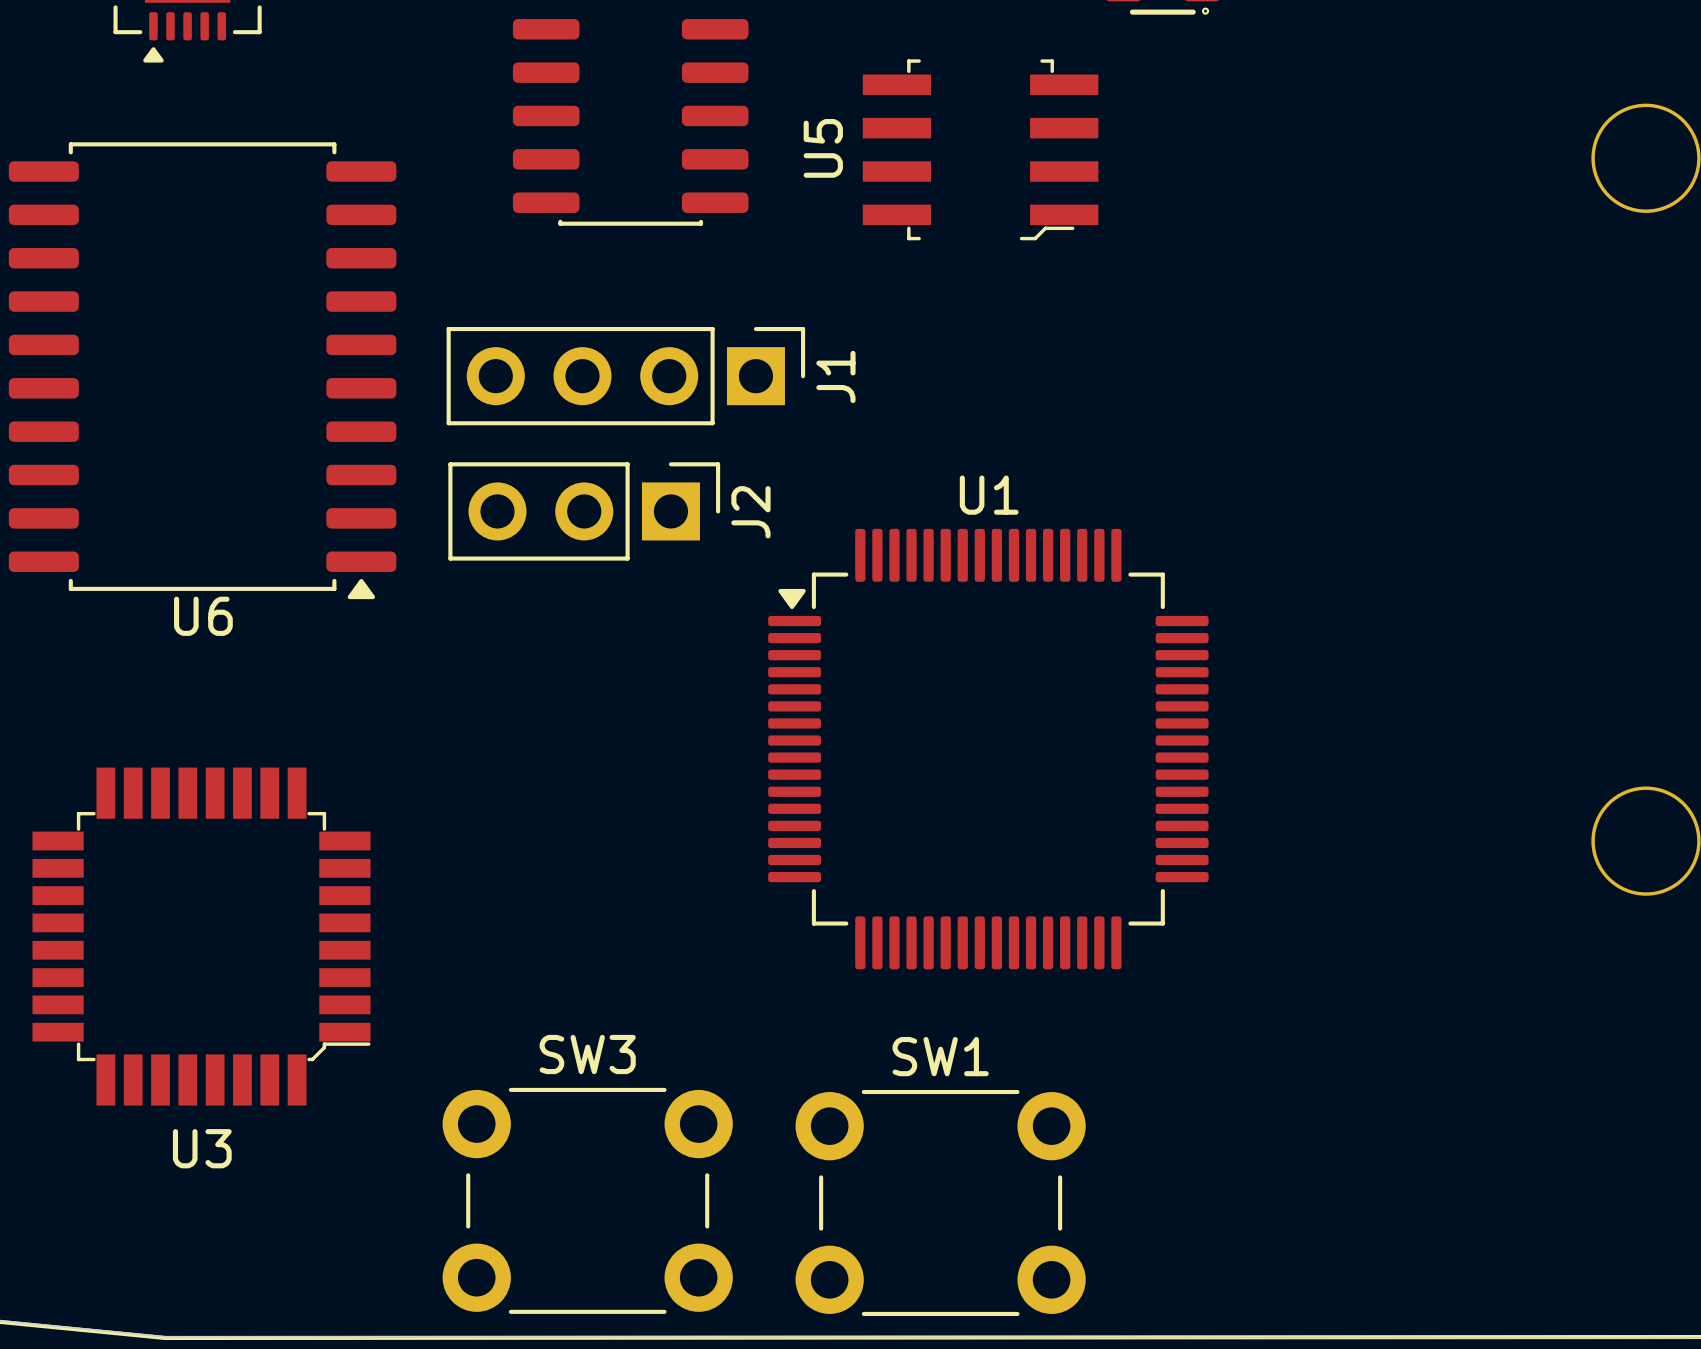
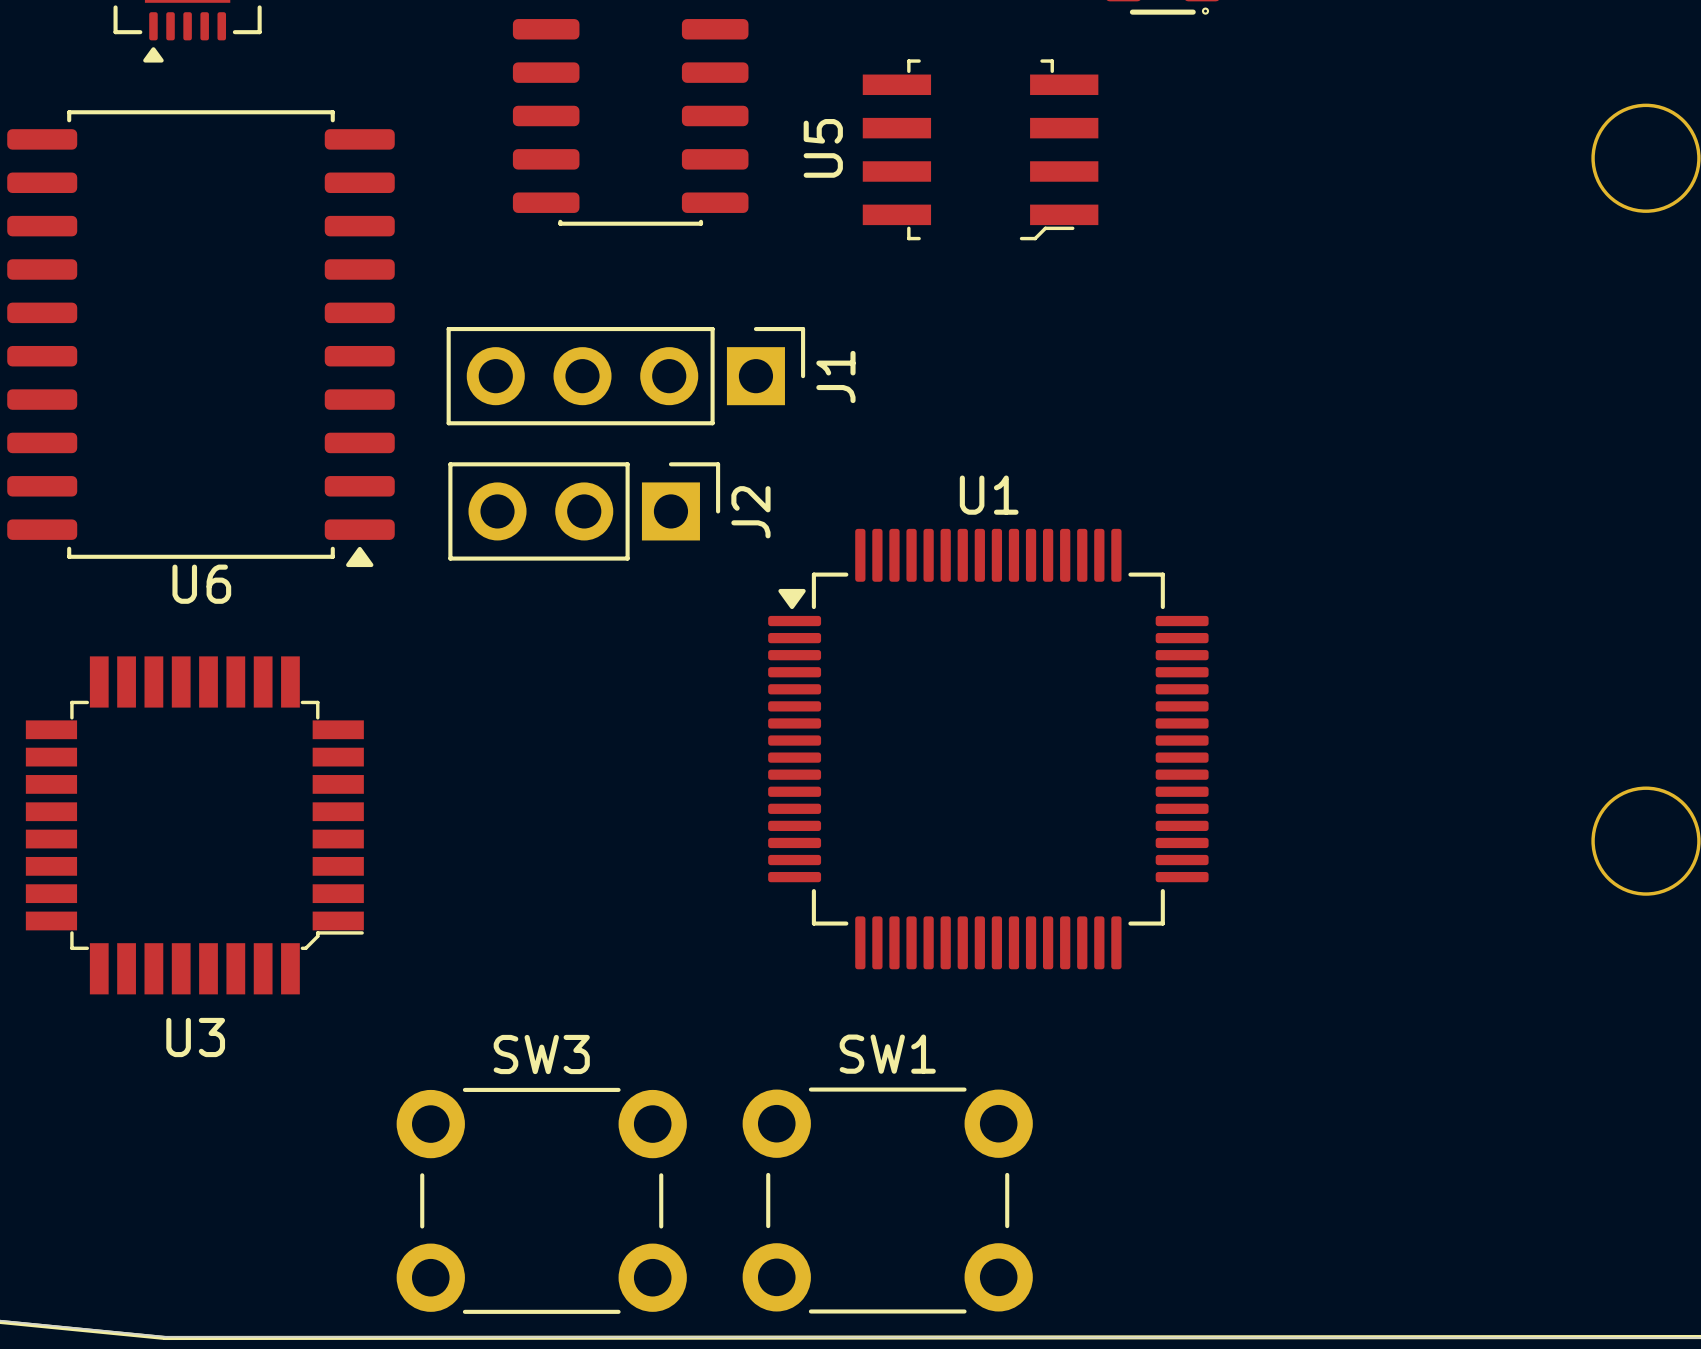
U6 position: (202, 370) -> (200, 338)
U3 position: (201, 936) -> (194, 825)
SW3 position: (587, 1200) -> (541, 1200)
SW1 position: (940, 1202) -> (887, 1200)

